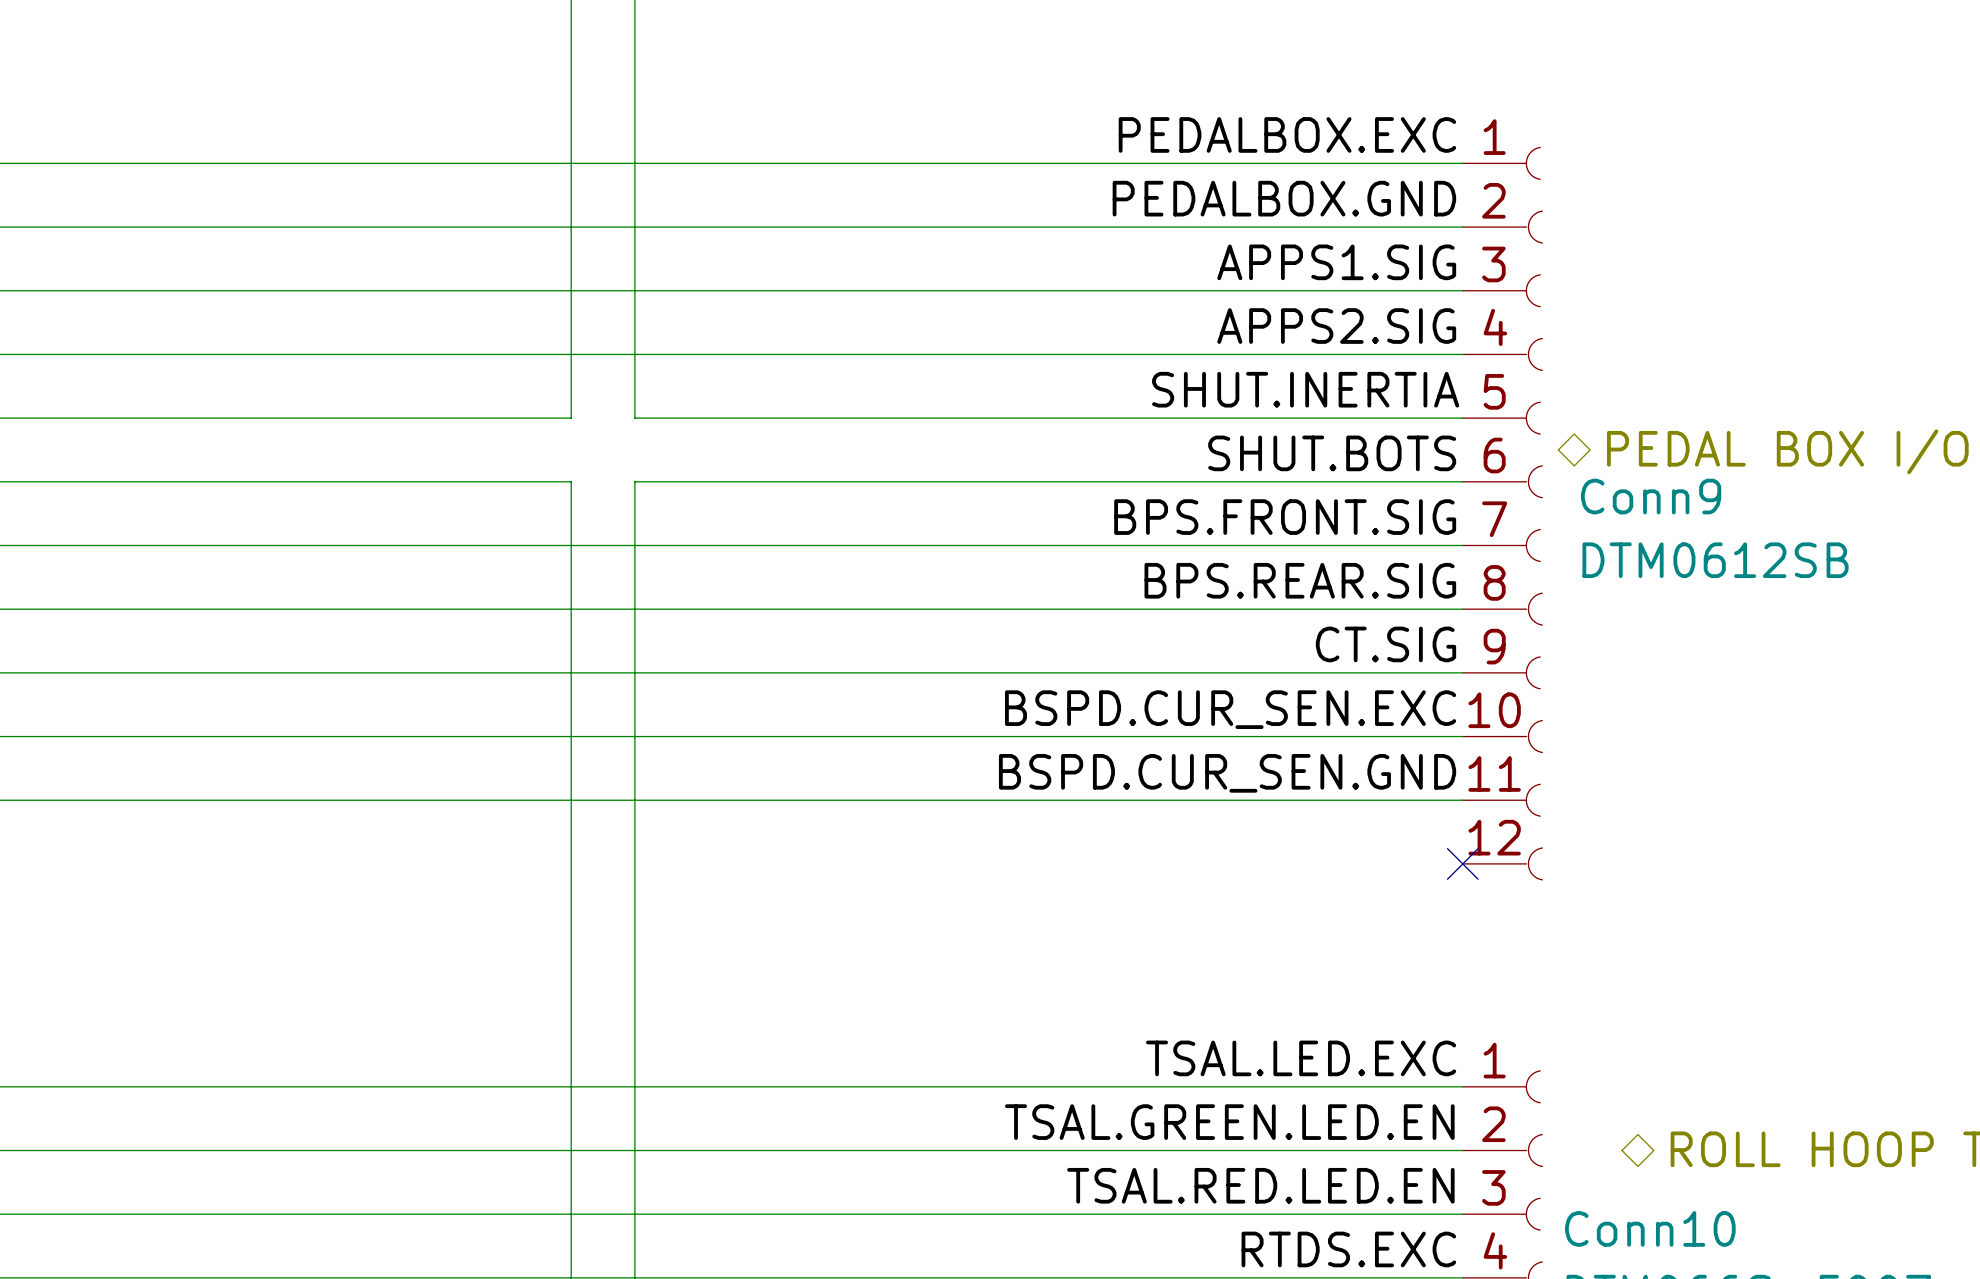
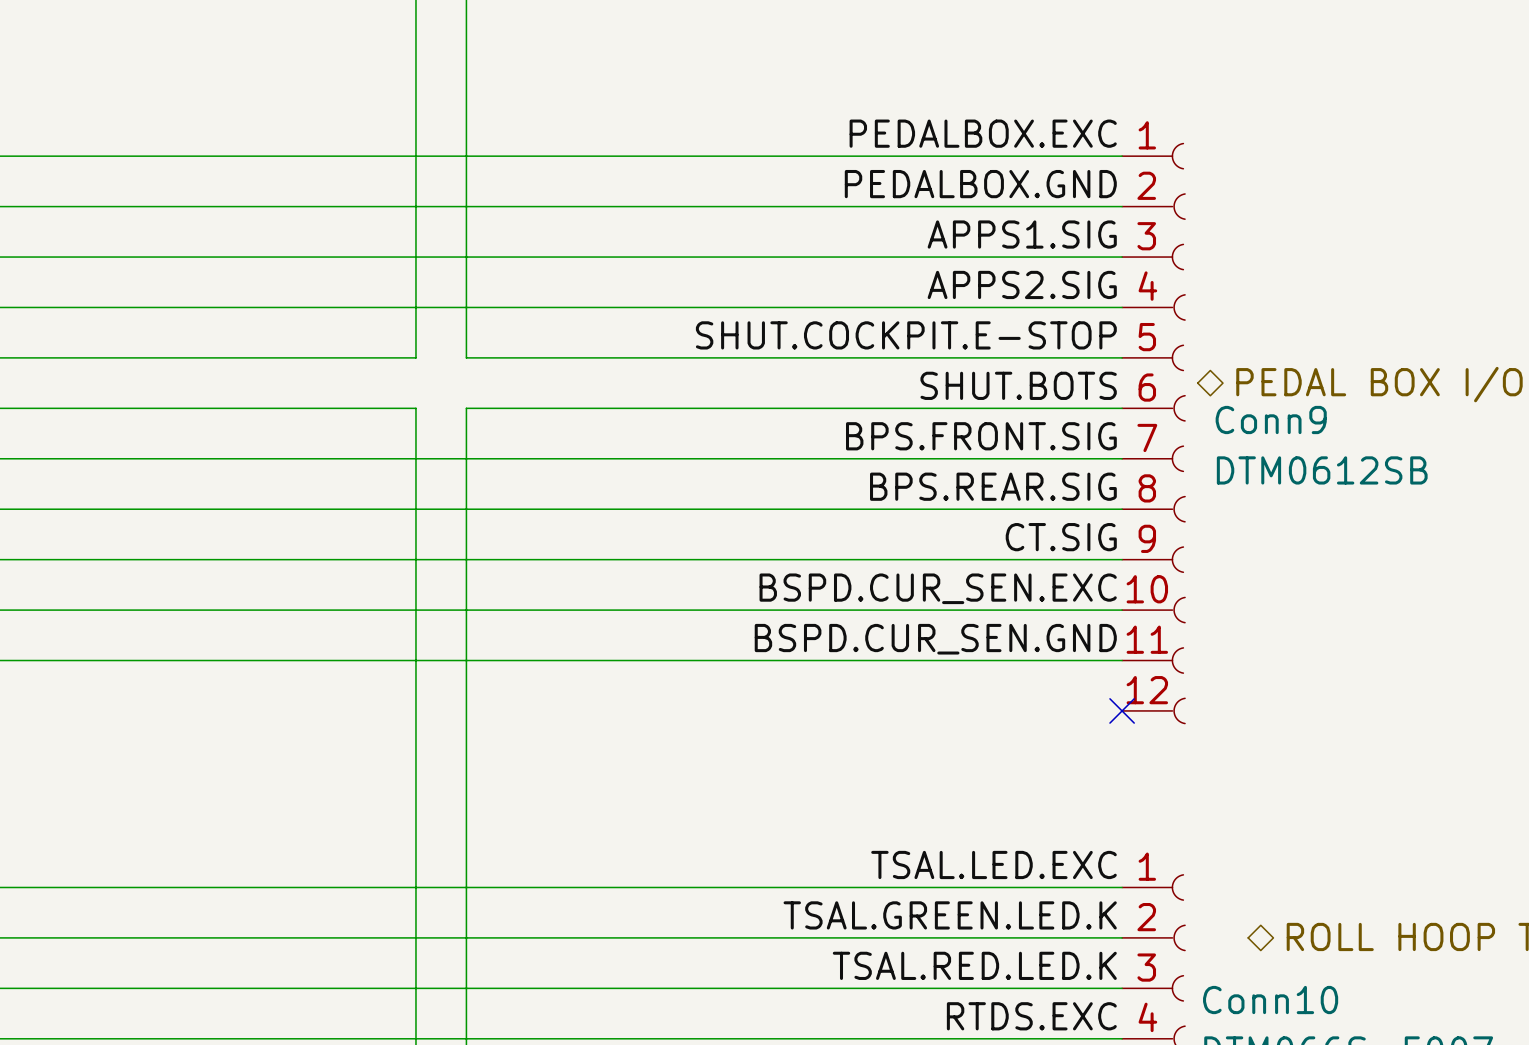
label: SHUT.INERTIA (1305, 389) -> SHUT.COCKPIT.E-STOP (906, 335)
label: TSAL.GREEN.LED.EN (1229, 1122) -> TSAL.GREEN.LED.K (950, 915)
label: TSAL.RED.LED.EN (1260, 1185) -> TSAL.RED.LED.K (974, 965)

